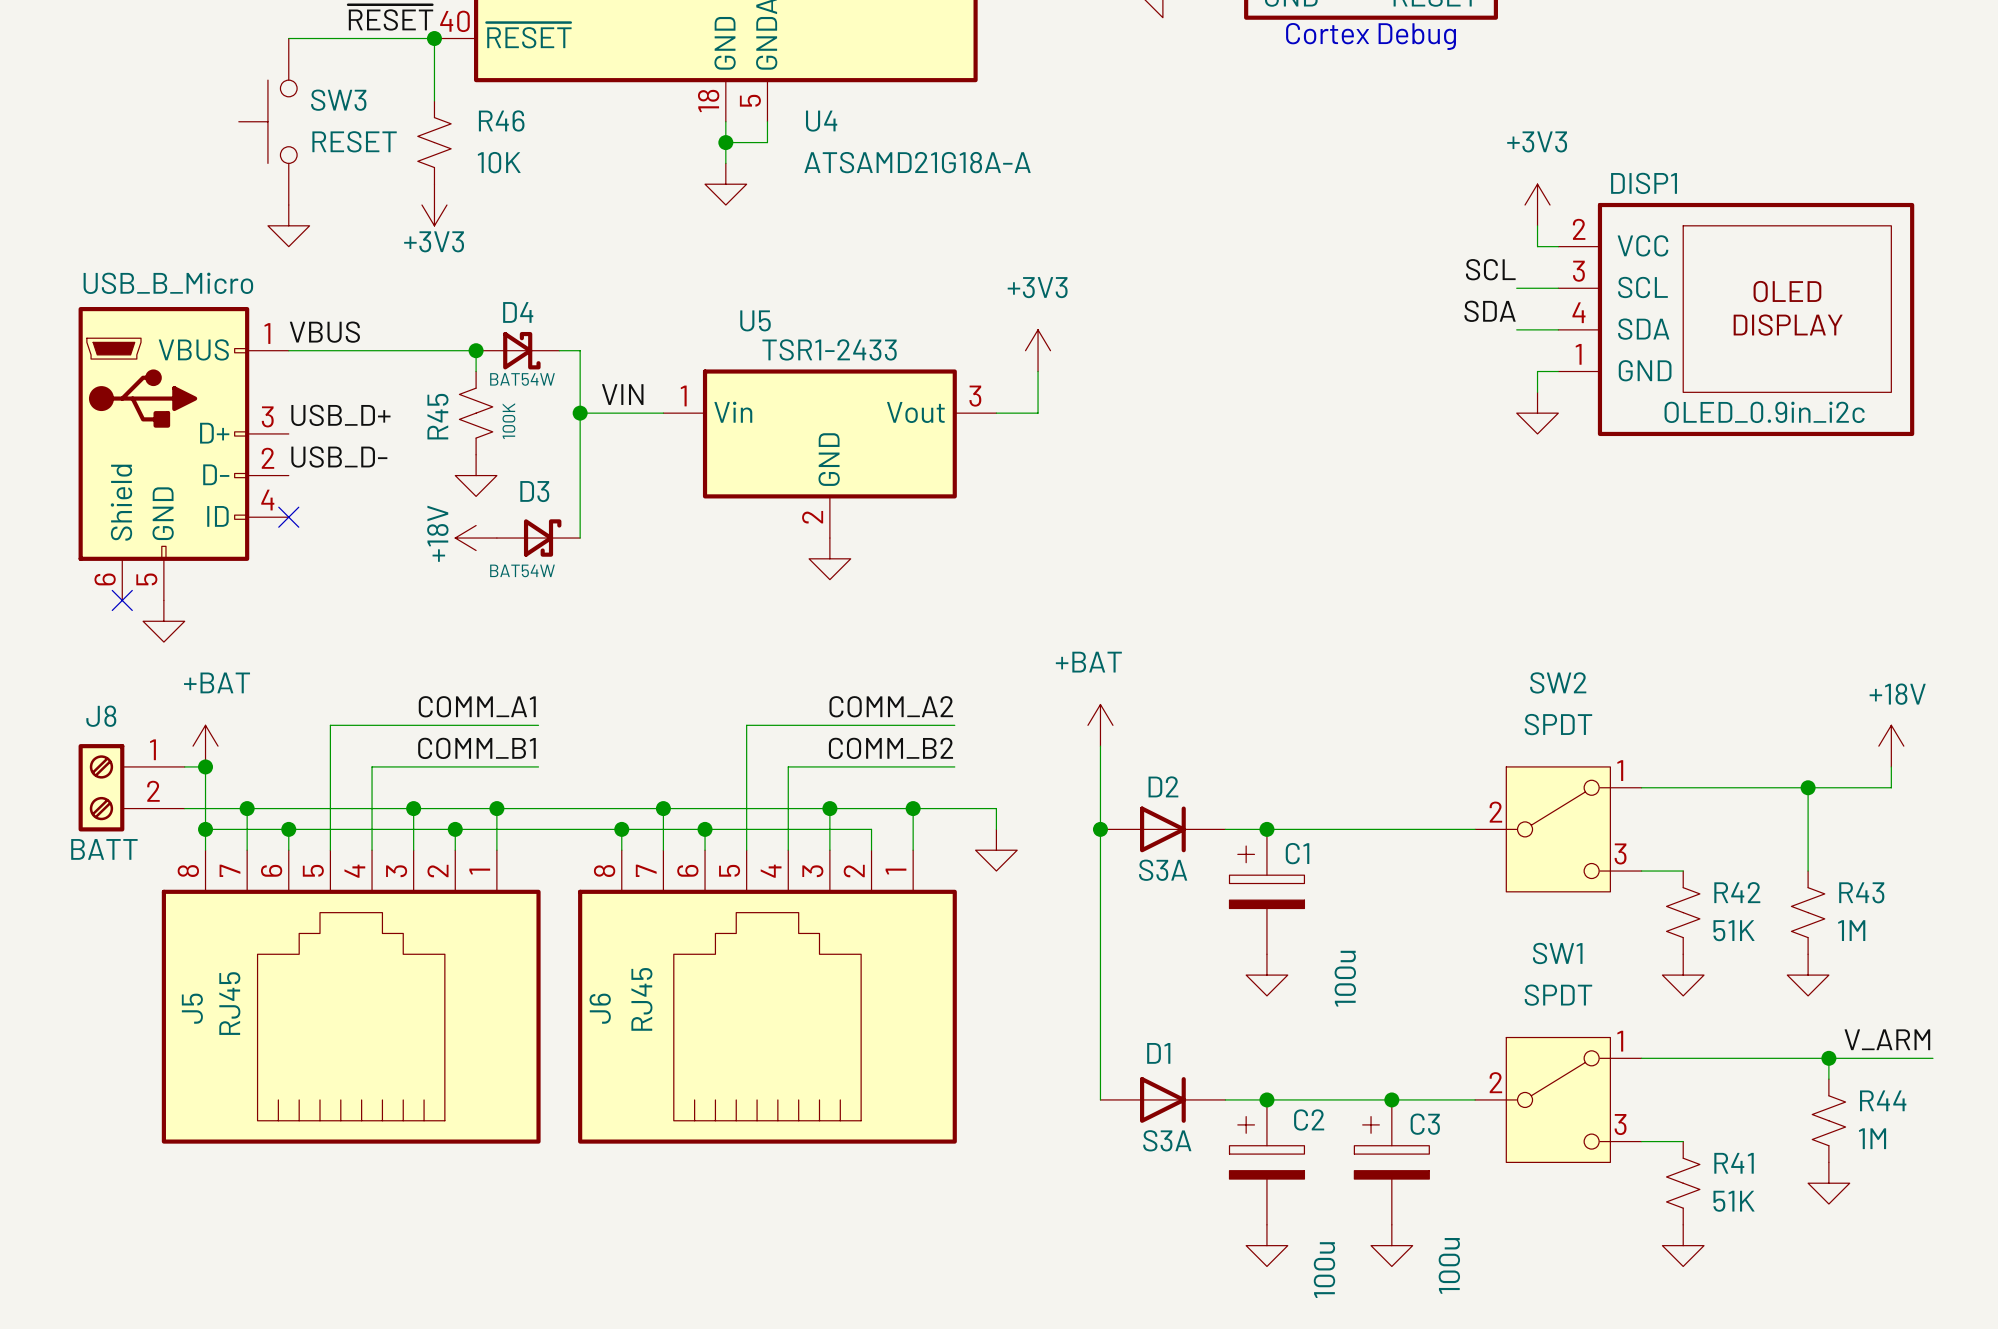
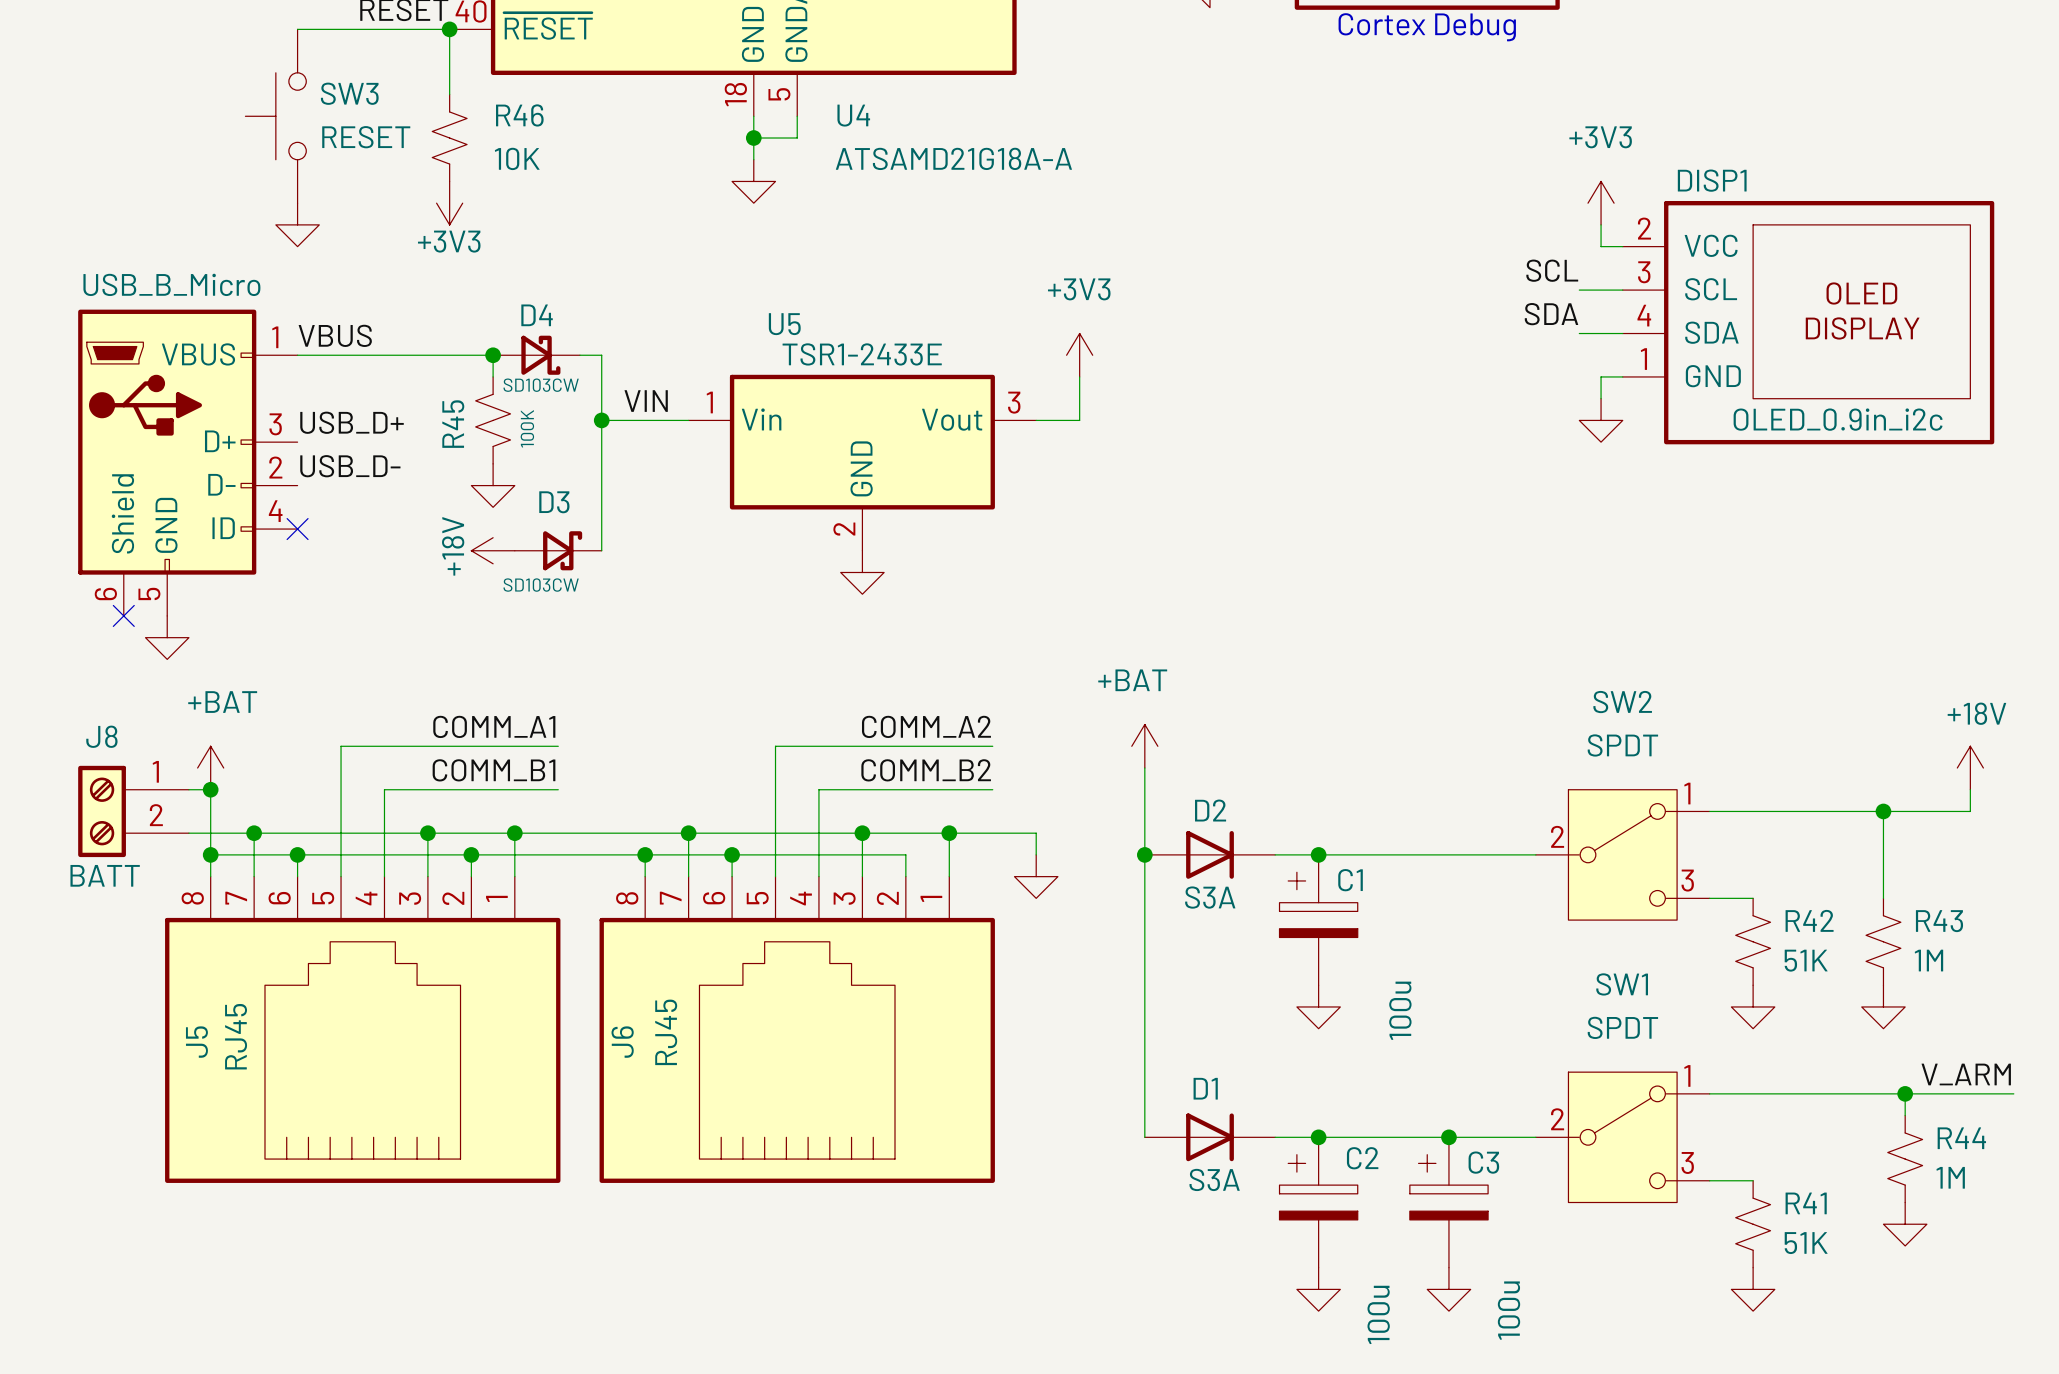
U5 value: TSR1-2433 (829, 349) -> TSR1-2433E (862, 354)
D4 value: BAT54W (522, 379) -> SD103CW (541, 385)
D3 value: BAT54W (522, 570) -> SD103CW (541, 585)

